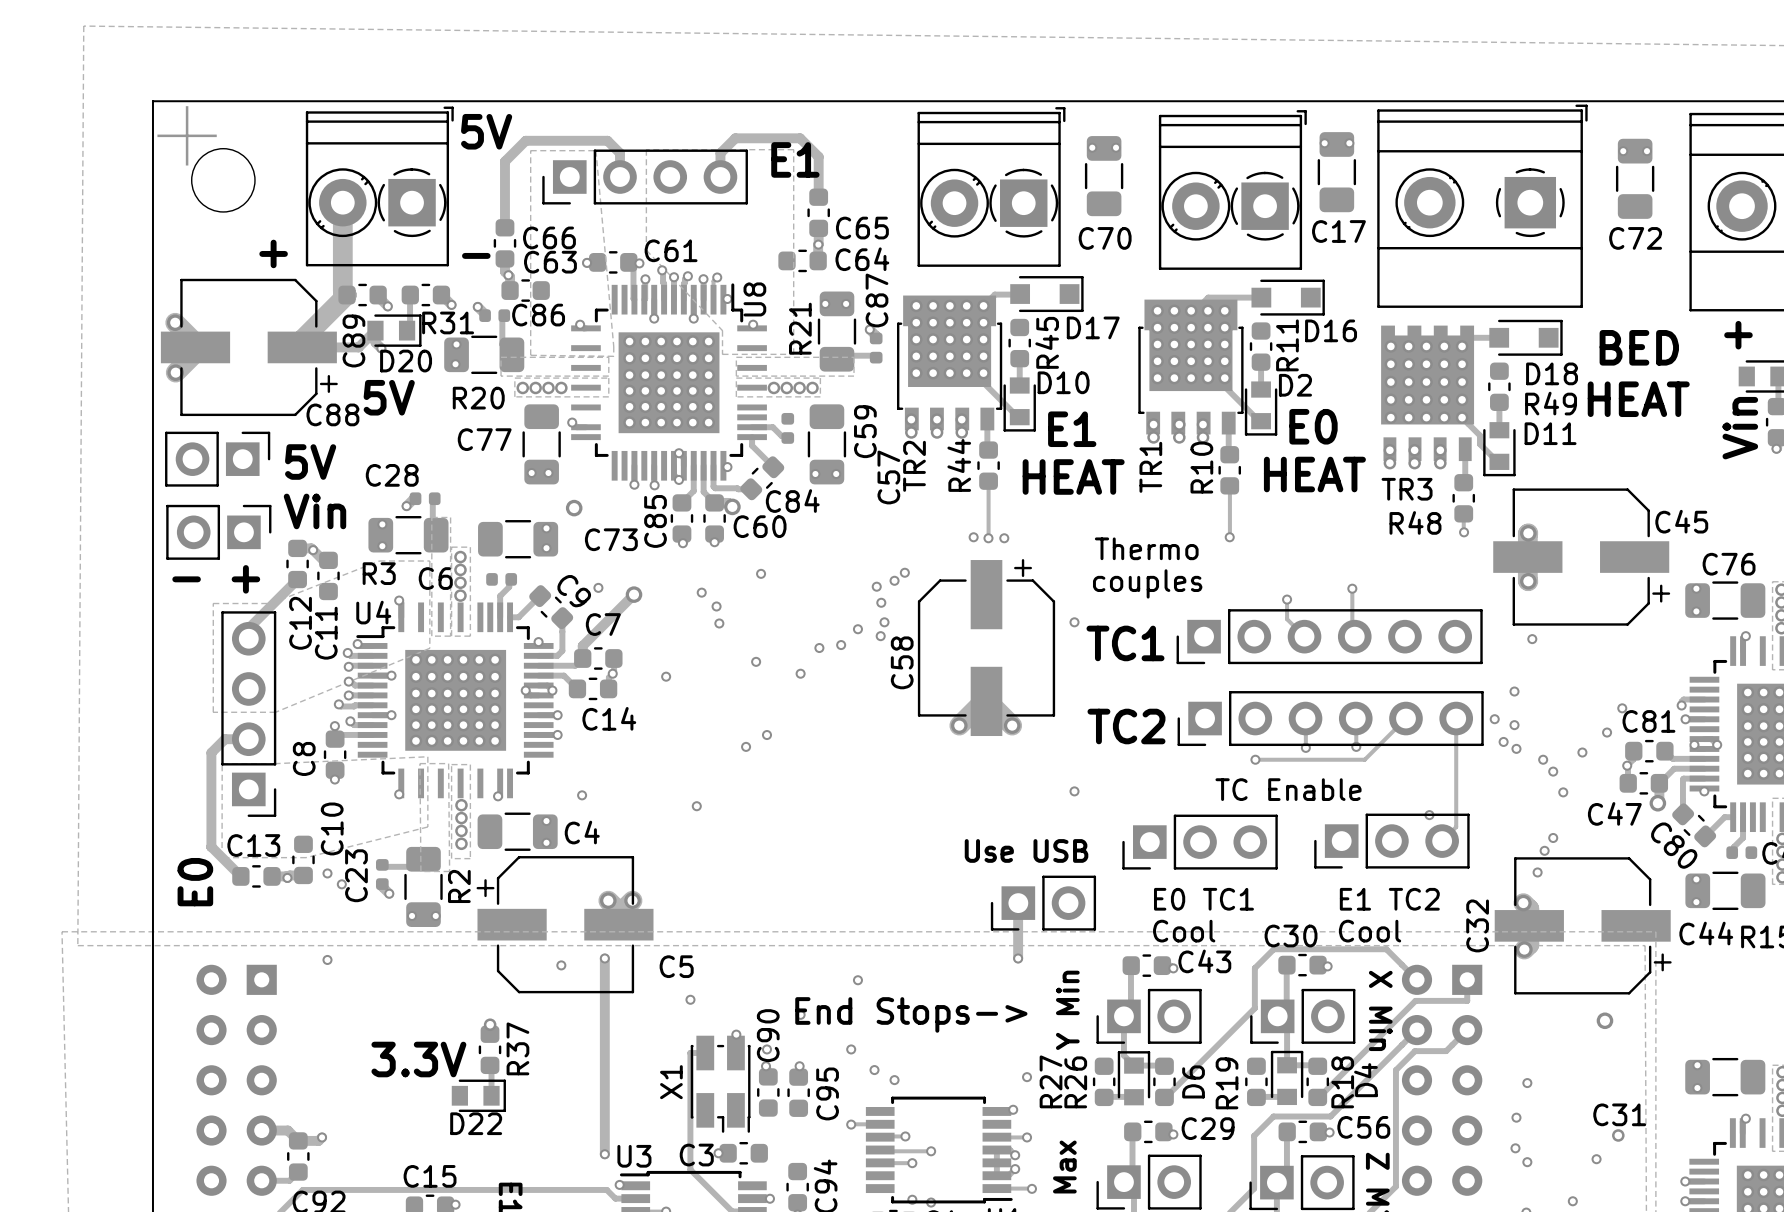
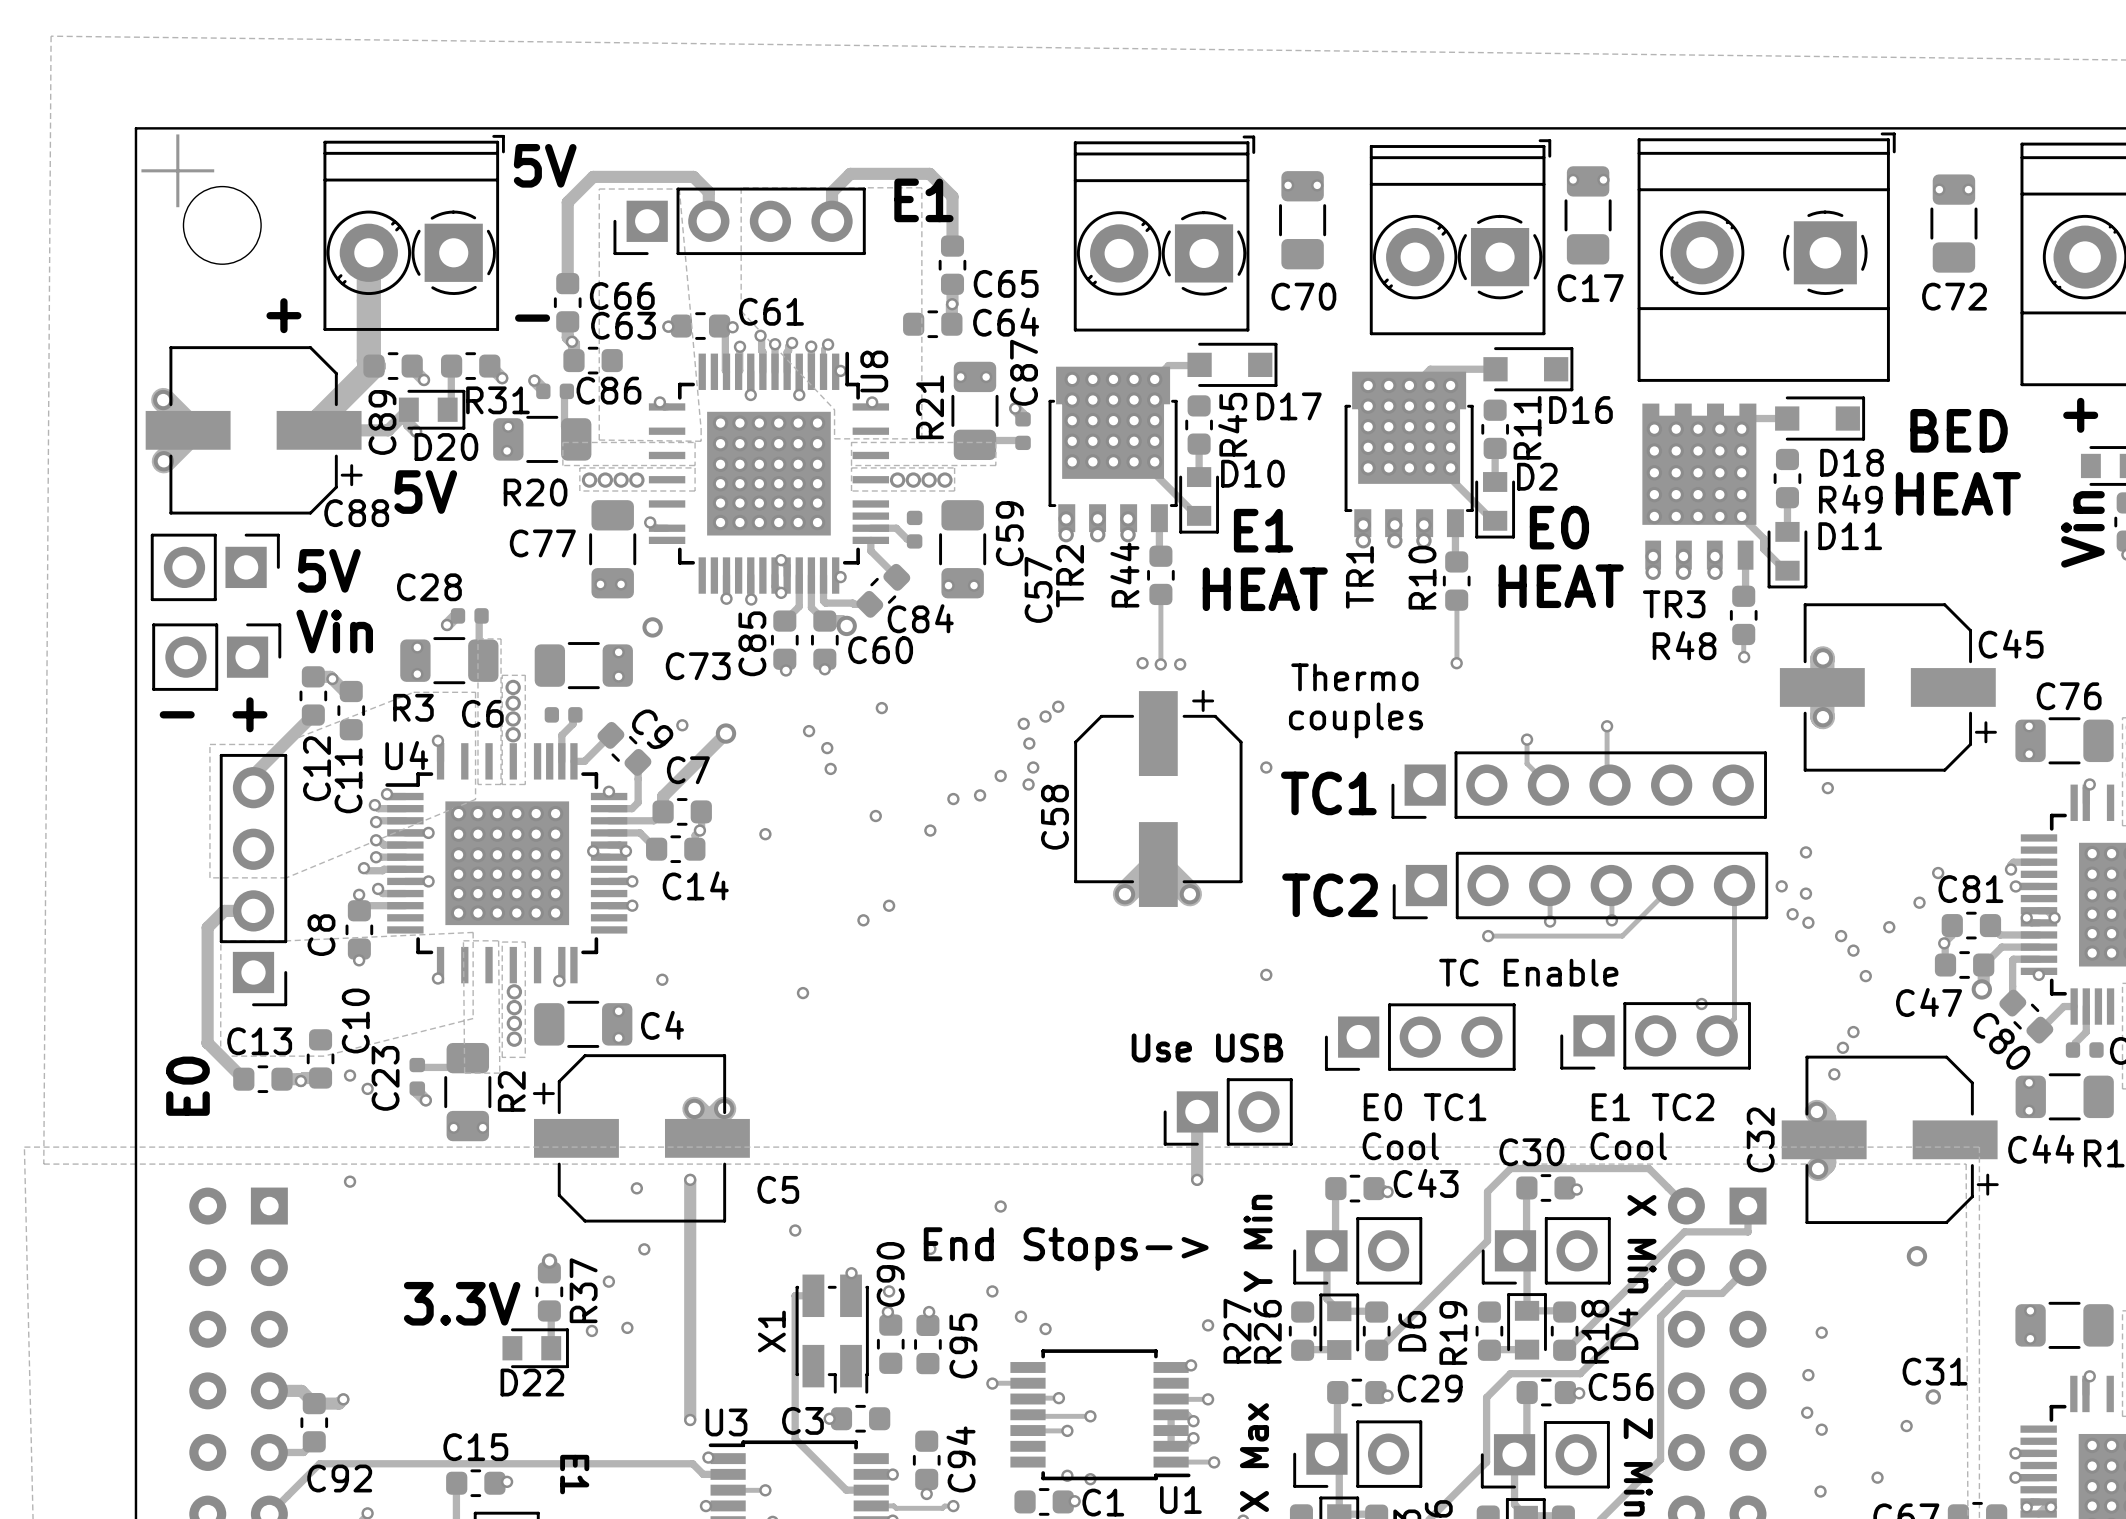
via: none -> (644, 1249)
via: none -> (608, 1281)
via: none -> (627, 1327)
via: none -> (591, 1330)

